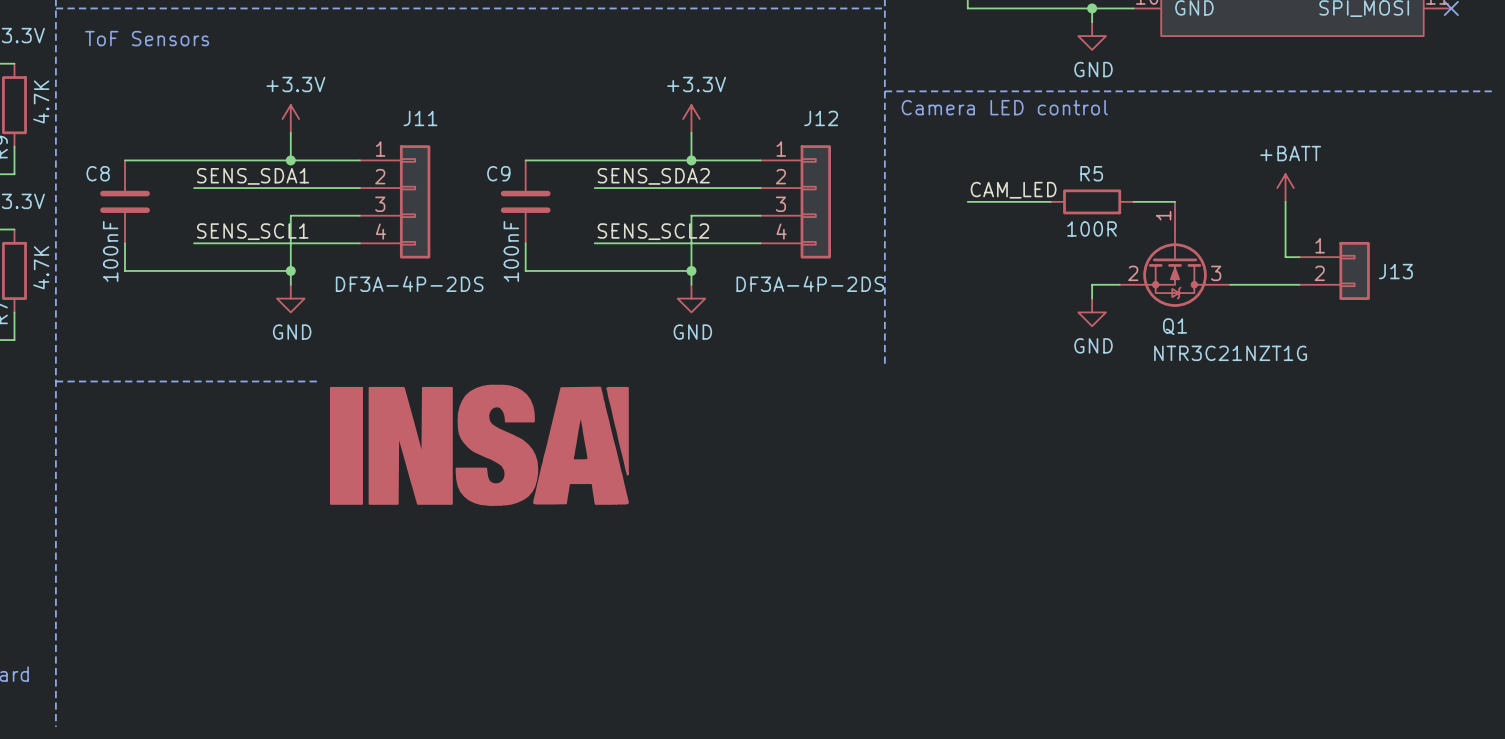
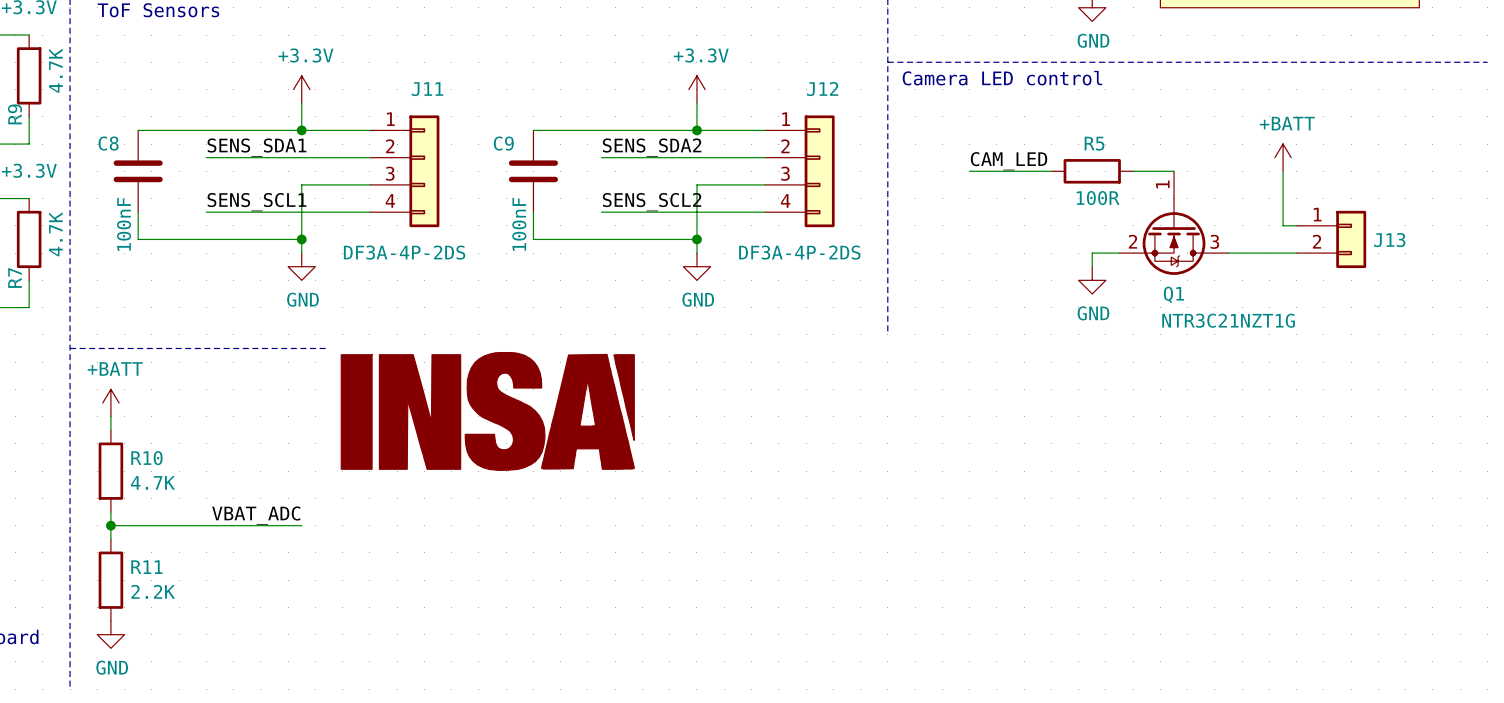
power symbol: none -> +BATT (110, 403)
wire: none -> (110, 416) (110, 430)
R10: none -> 4.7K (110, 471)
wire: none -> (110, 512) (110, 539)
label: none -> VBAT_ADC (256, 515)
wire: none -> (110, 525) (301, 525)
junction: none -> (110, 525)
R11: none -> 2.2K (110, 580)
power symbol: none -> GND (110, 634)

